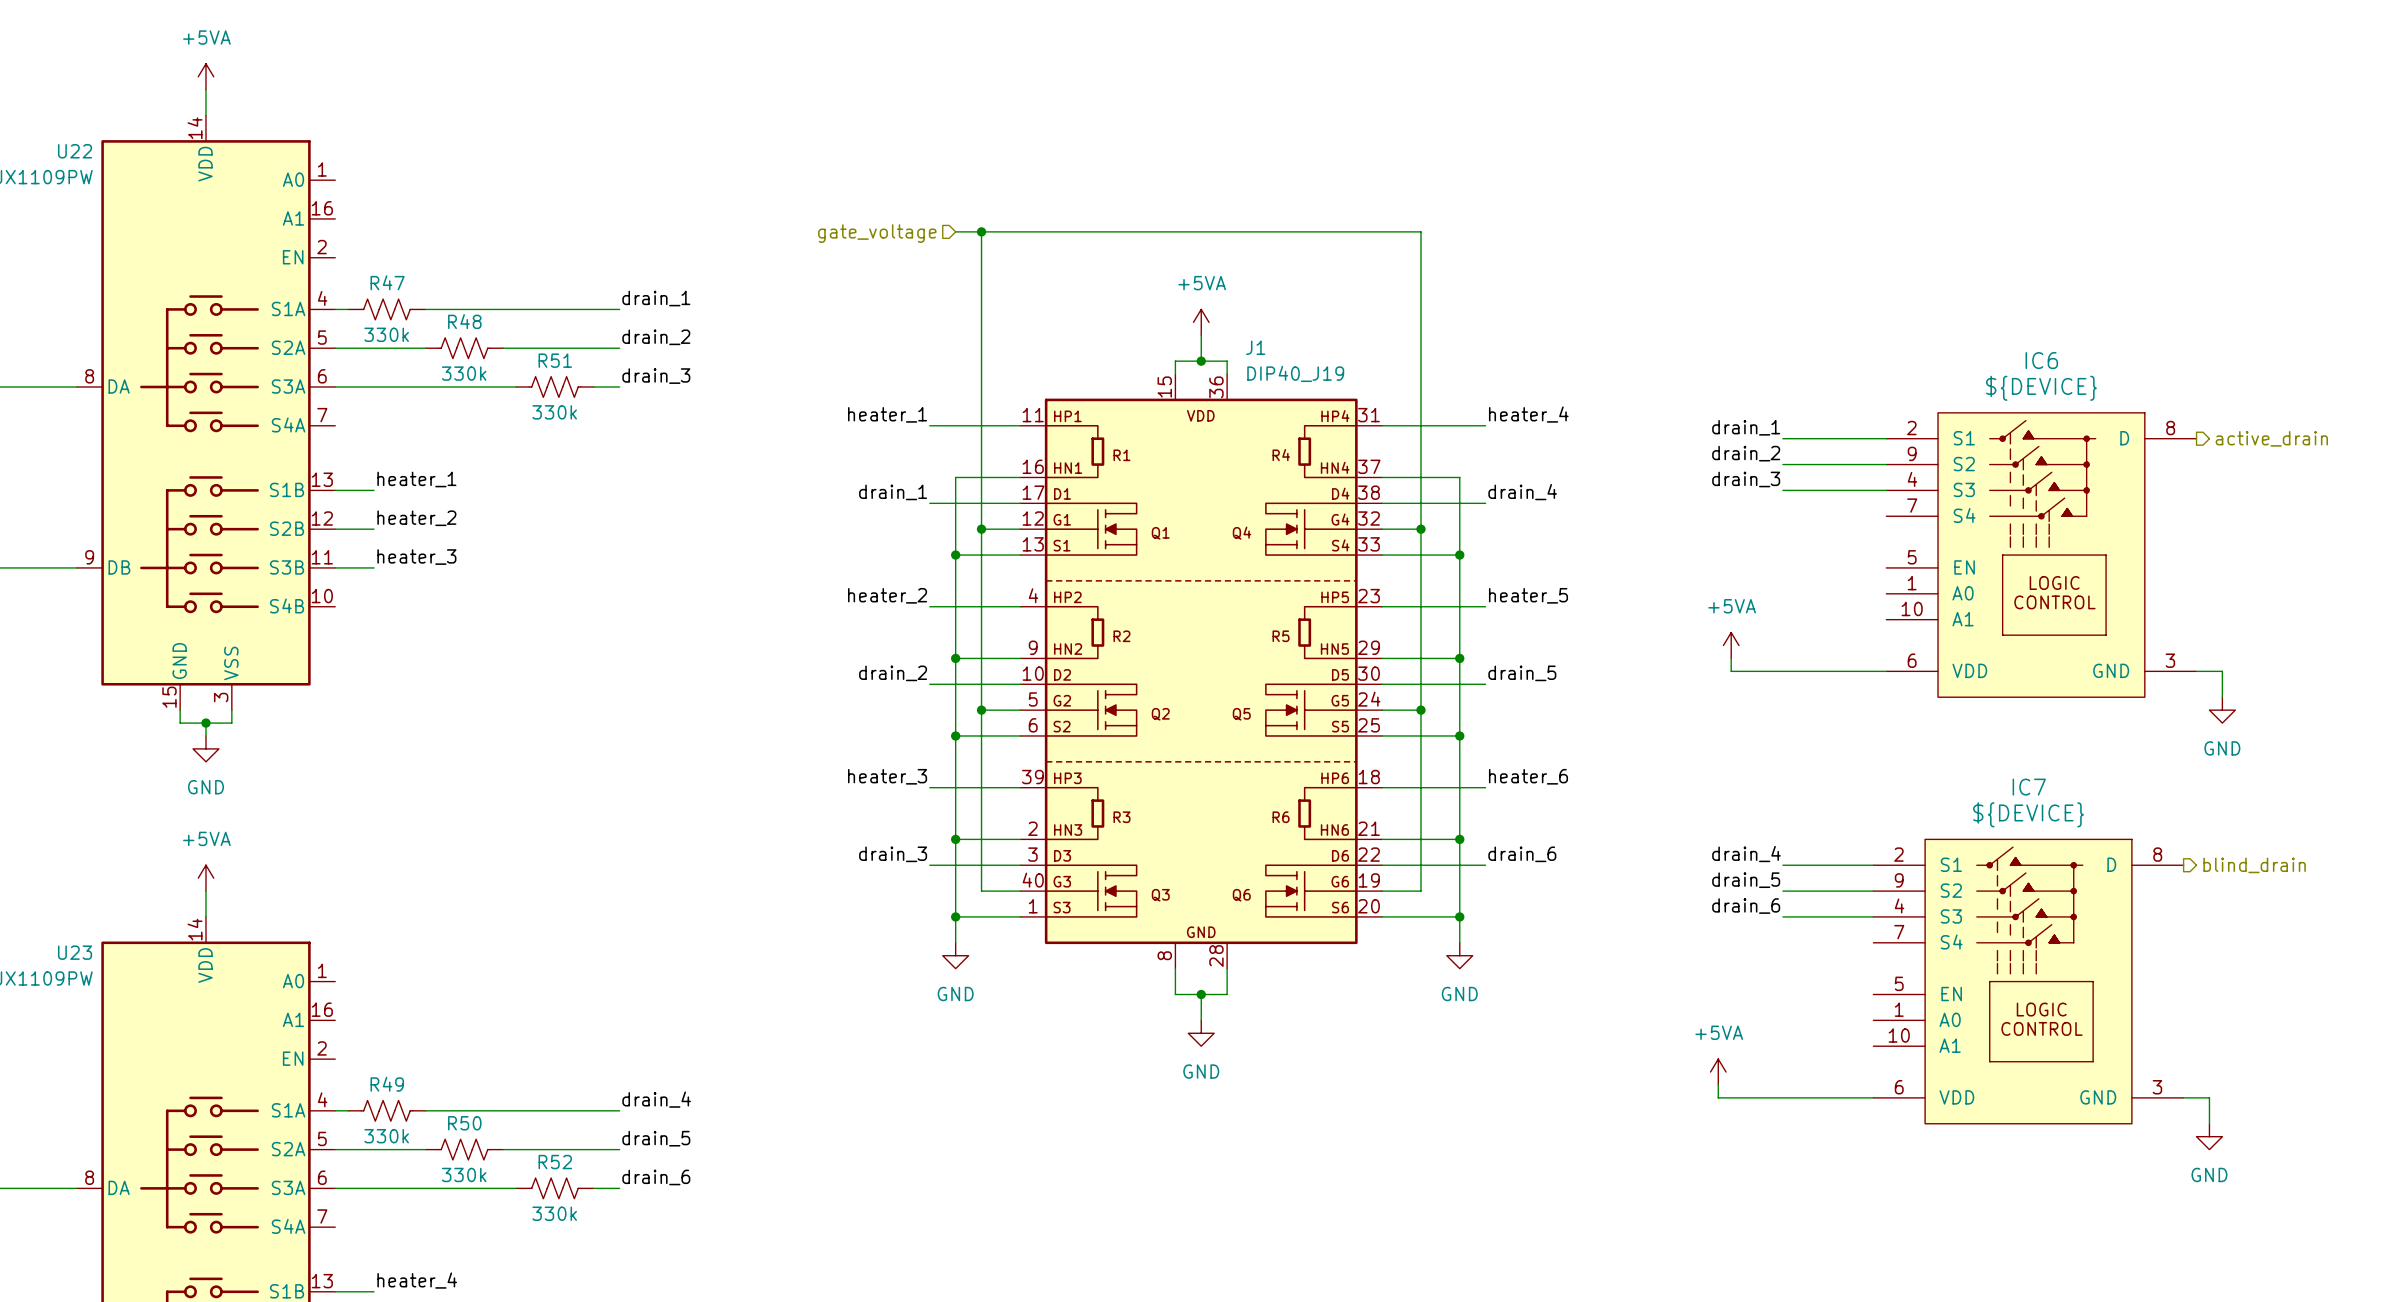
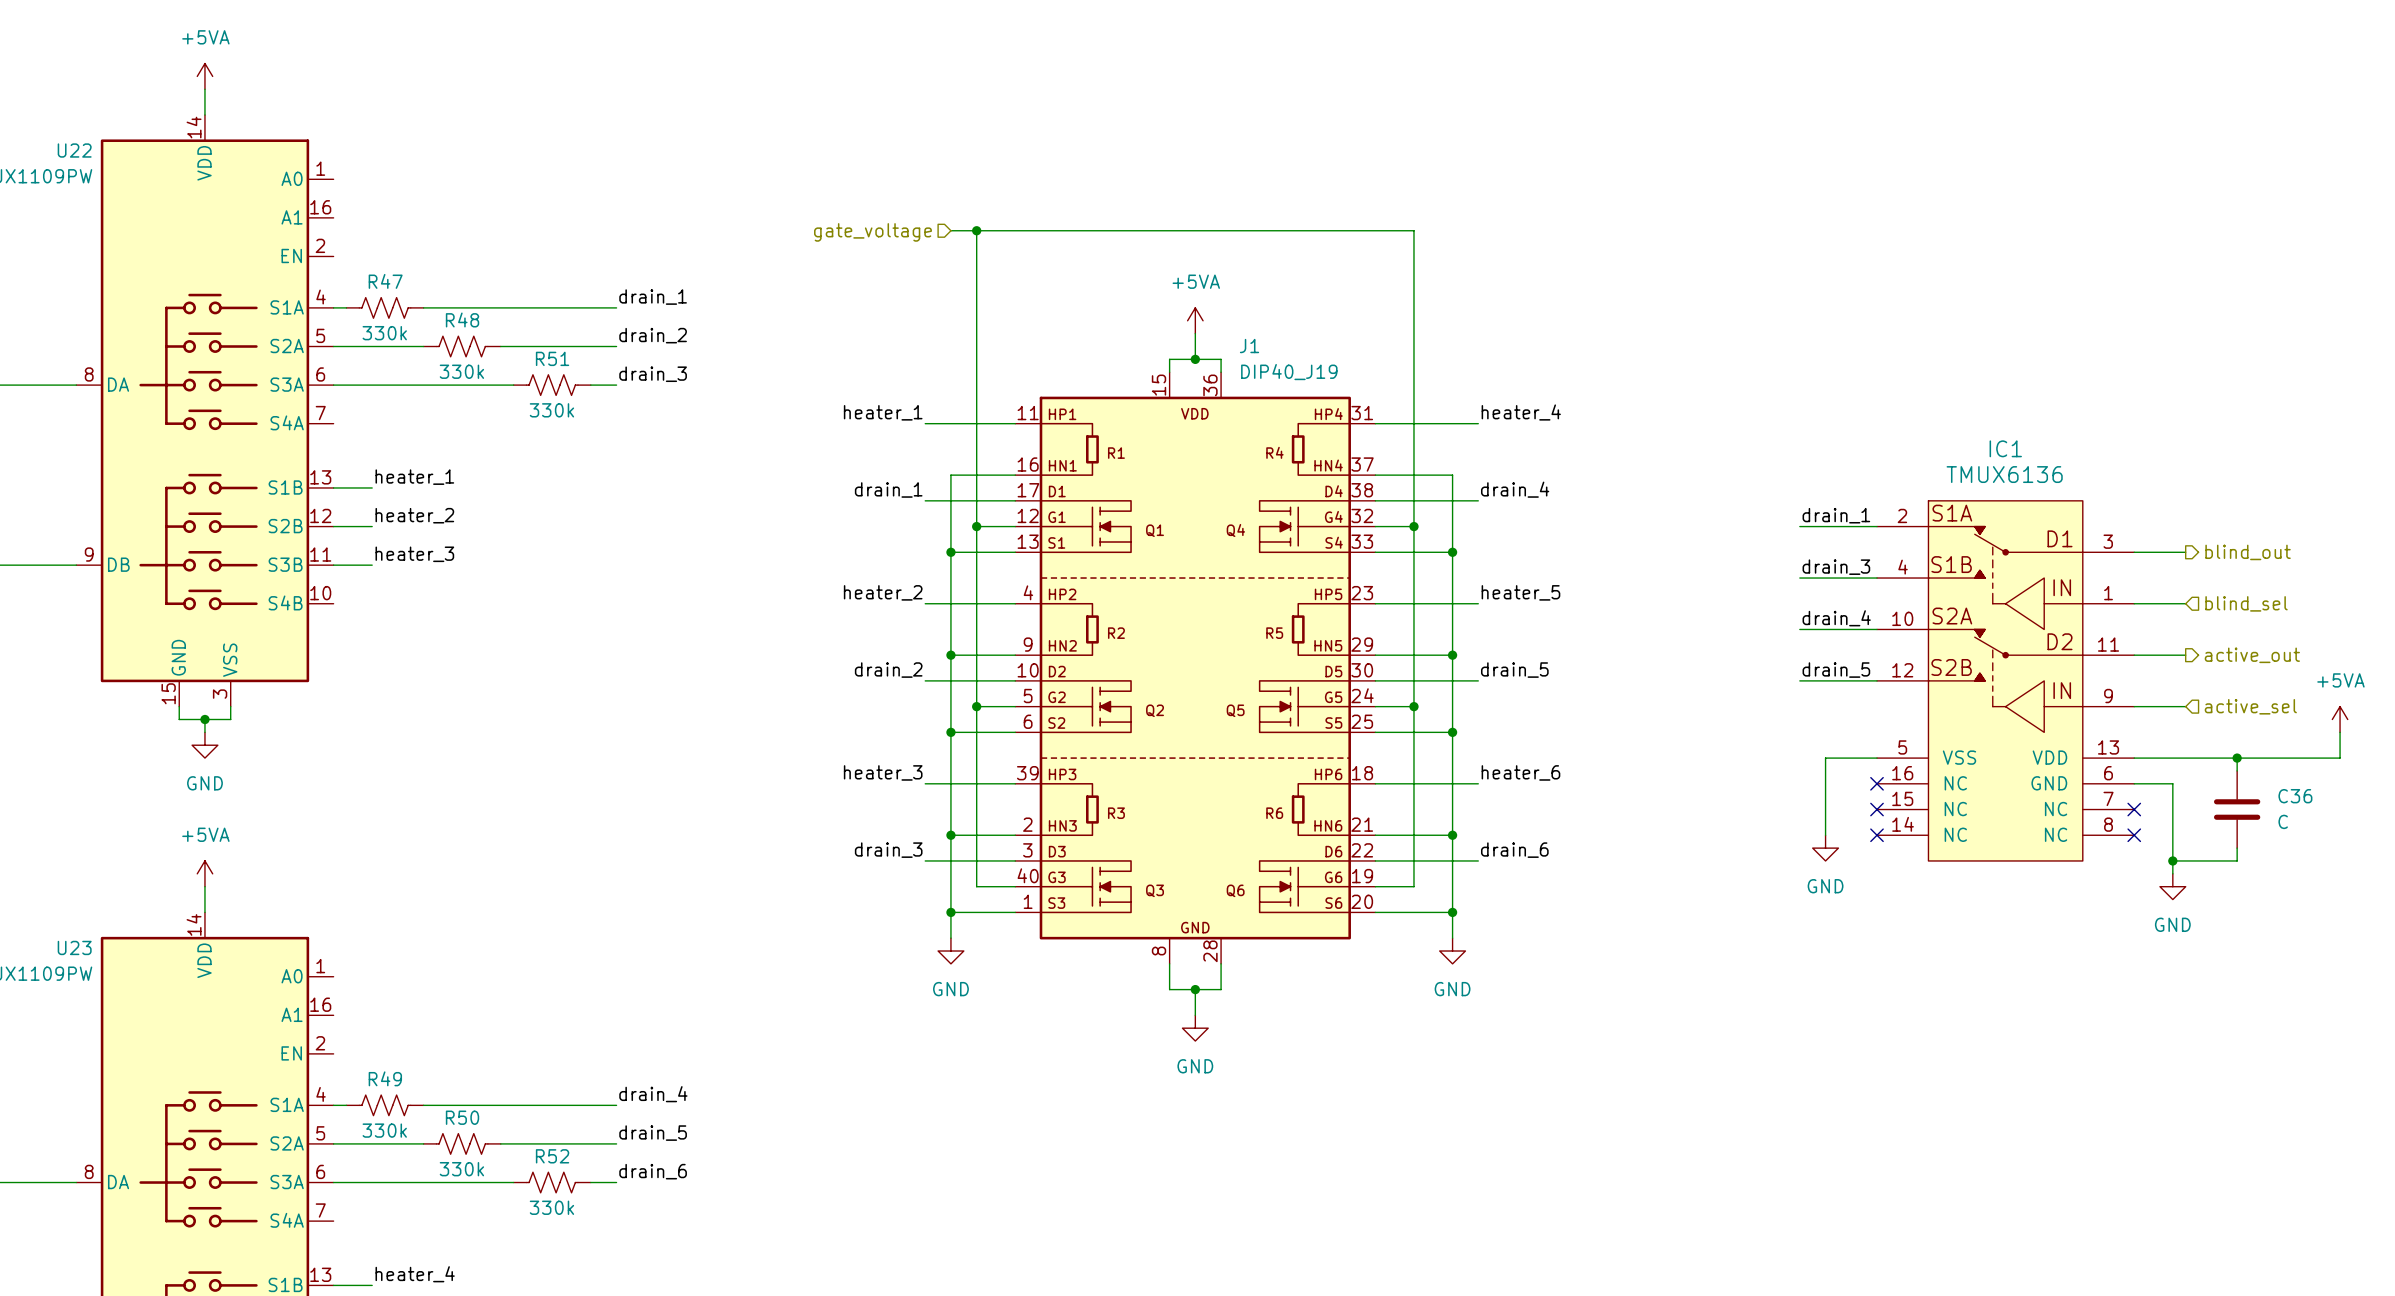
label position: drain_1 (1746, 427) -> drain_1 (1836, 515)
wire: (1782, 438) (1886, 438) -> none
hierarchical label: active_drain (2271, 438) -> none
label: drain_2 (1746, 453) -> none
wire: (1782, 464) (1886, 464) -> none
label position: drain_3 (1746, 479) -> drain_3 (1836, 567)
wire: (1782, 490) (1886, 490) -> none
wire: none -> (1799, 526) (1877, 526)
IC6: ${DEVICE} (2041, 555) -> none
wire: none -> (2134, 552) (2185, 552)
hierarchical label: none -> blind_out (2248, 552)
wire: none -> (1799, 578) (1877, 578)
wire: none -> (2134, 603) (2185, 603)
hierarchical label: none -> blind_sel (2246, 603)
wire: none -> (1799, 629) (1877, 629)
power symbol: +5VA (1731, 645) -> none
wire: (1731, 658) (1731, 671) (1886, 671) -> none
wire: none -> (2134, 655) (2185, 655)
hierarchical label: none -> active_out (2252, 655)
wire: (2196, 671) (2222, 671) (2222, 697) -> none
wire: none -> (1799, 680) (1877, 680)
IC1: none -> TMUX6136 (2005, 680)
wire: none -> (2134, 706) (2185, 706)
power symbol: GND (2222, 710) -> none
hierarchical label: none -> active_sel (2250, 706)
power symbol: none -> +5VA (2340, 719)
wire: none -> (2340, 732) (2340, 758) (2134, 758)
wire: none -> (1877, 758) (1825, 758) (1825, 835)
wire: none -> (2237, 758) (2237, 770)
junction: none -> (2237, 758)
no-connect mark: none -> (1877, 783)
wire: none -> (2134, 783) (2172, 783) (2172, 873)
no-connect mark: none -> (1877, 809)
no-connect mark: none -> (2134, 809)
C36: none -> C (2237, 809)
no-connect mark: none -> (1877, 835)
no-connect mark: none -> (2134, 835)
power symbol: none -> GND (1825, 848)
wire: none -> (2237, 848) (2237, 860) (2172, 860)
label position: drain_4 (1746, 854) -> drain_4 (1836, 618)
wire: (1782, 865) (1873, 865) -> none
junction: none -> (2172, 860)
hierarchical label: blind_drain (2254, 865) -> none
label position: drain_5 (1746, 880) -> drain_5 (1836, 670)
wire: (1782, 891) (1873, 891) -> none
power symbol: none -> GND (2172, 886)
label: drain_6 (1746, 906) -> none
wire: (1782, 916) (1873, 916) -> none
IC7: ${DEVICE} (2028, 981) -> none
power symbol: +5VA (1718, 1072) -> none
wire: (1718, 1084) (1718, 1097) (1873, 1097) -> none
wire: (2183, 1097) (2209, 1097) (2209, 1123) -> none
power symbol: GND (2209, 1136) -> none

